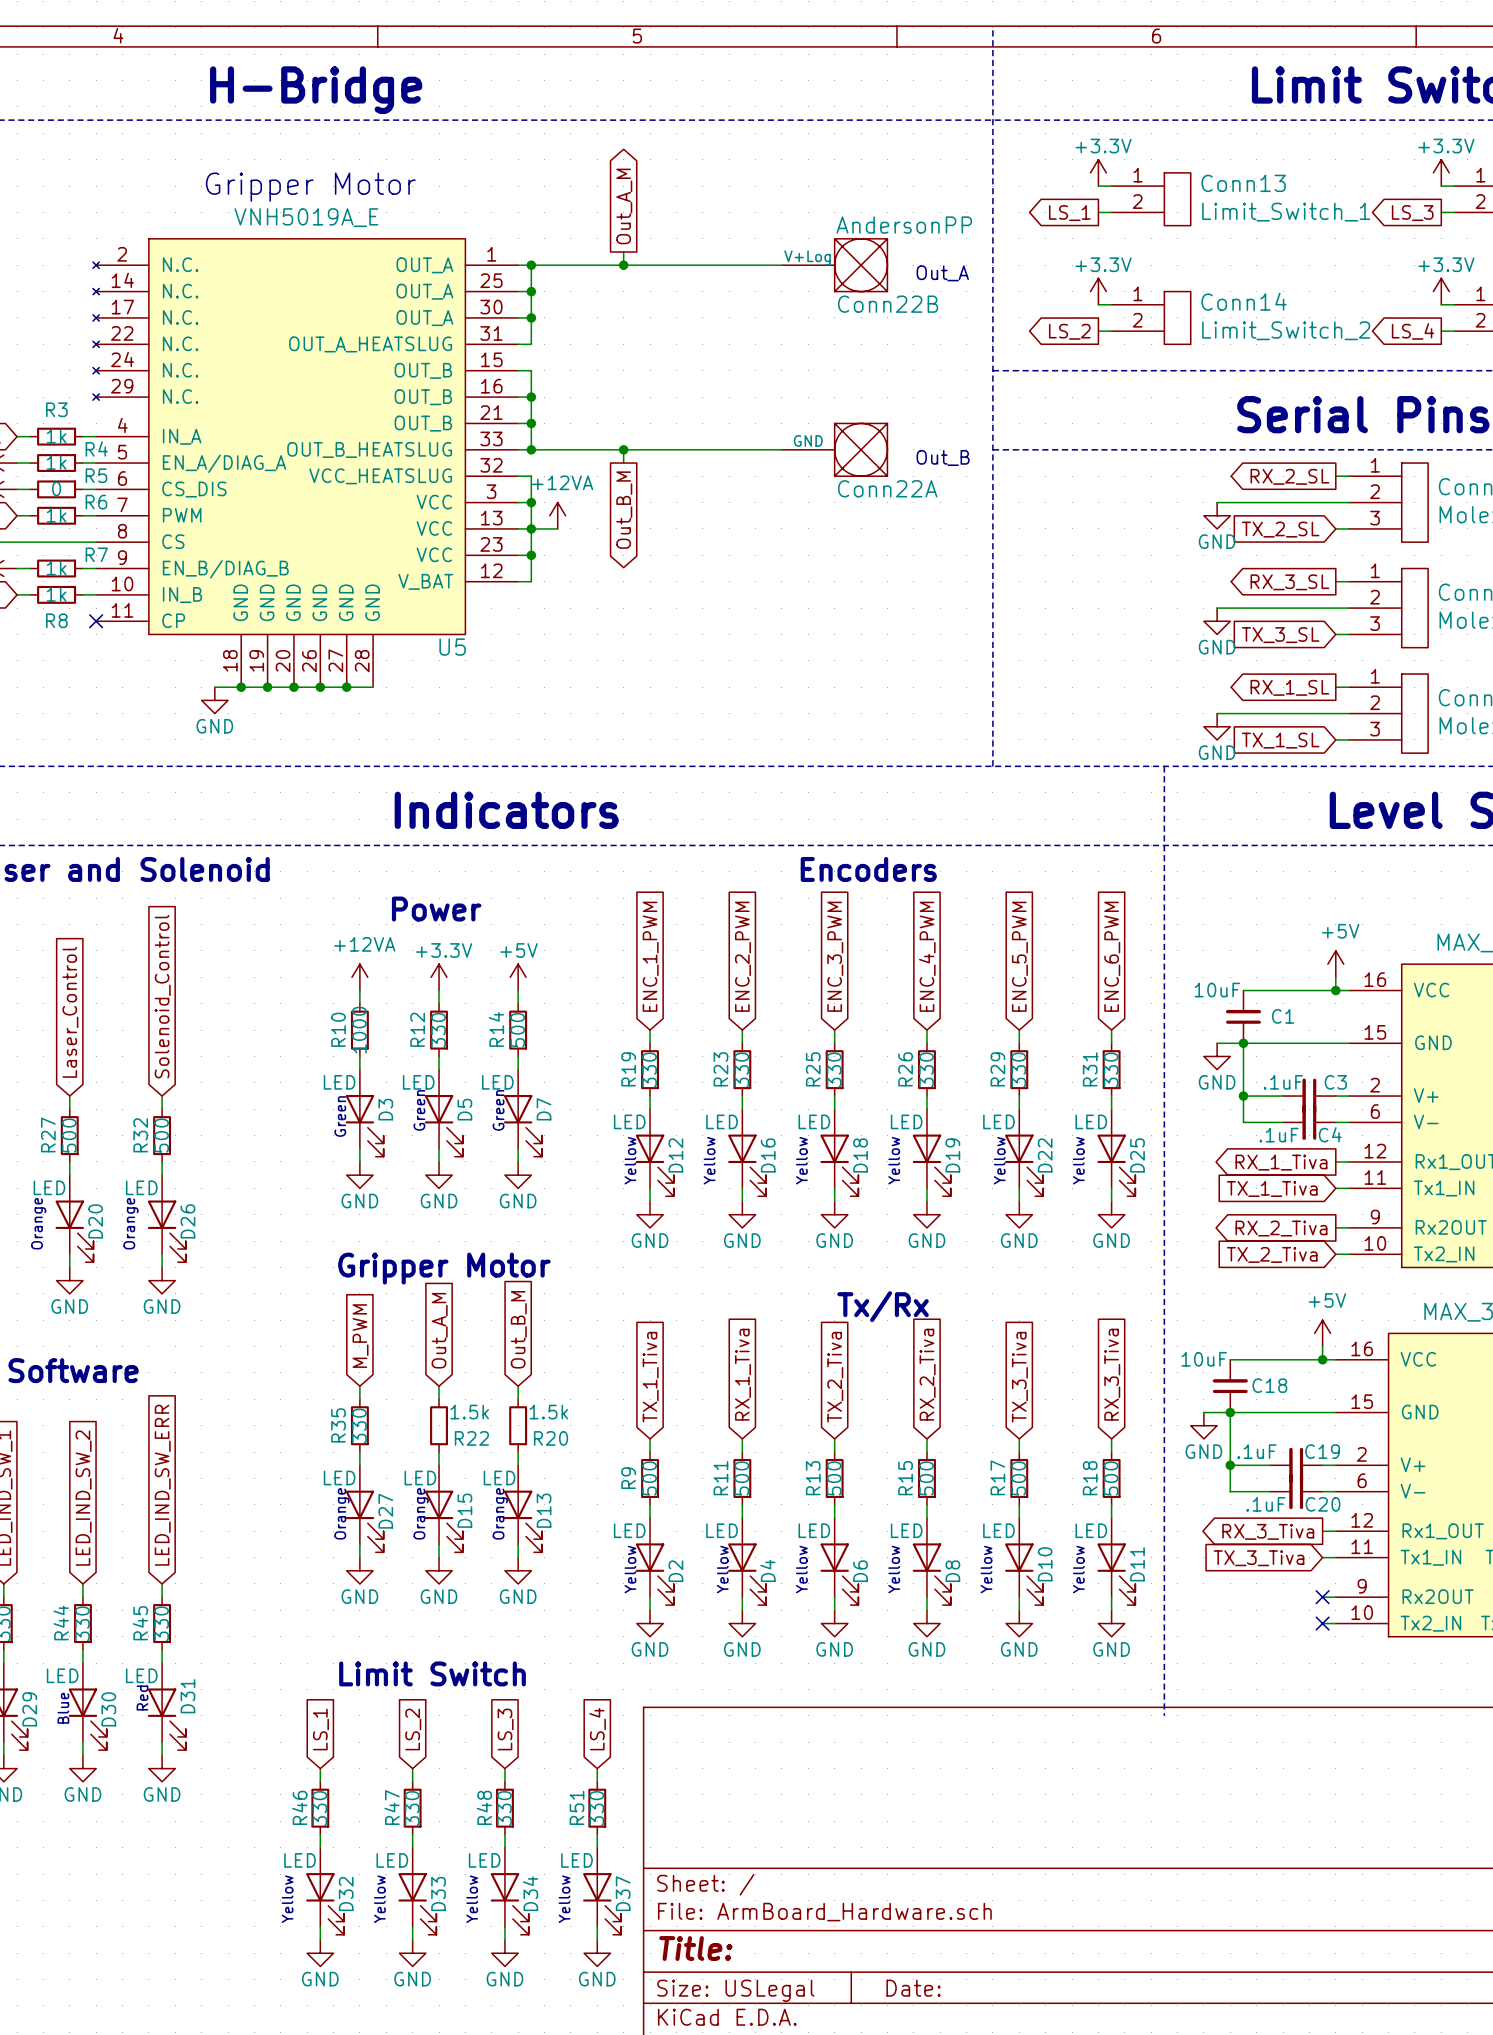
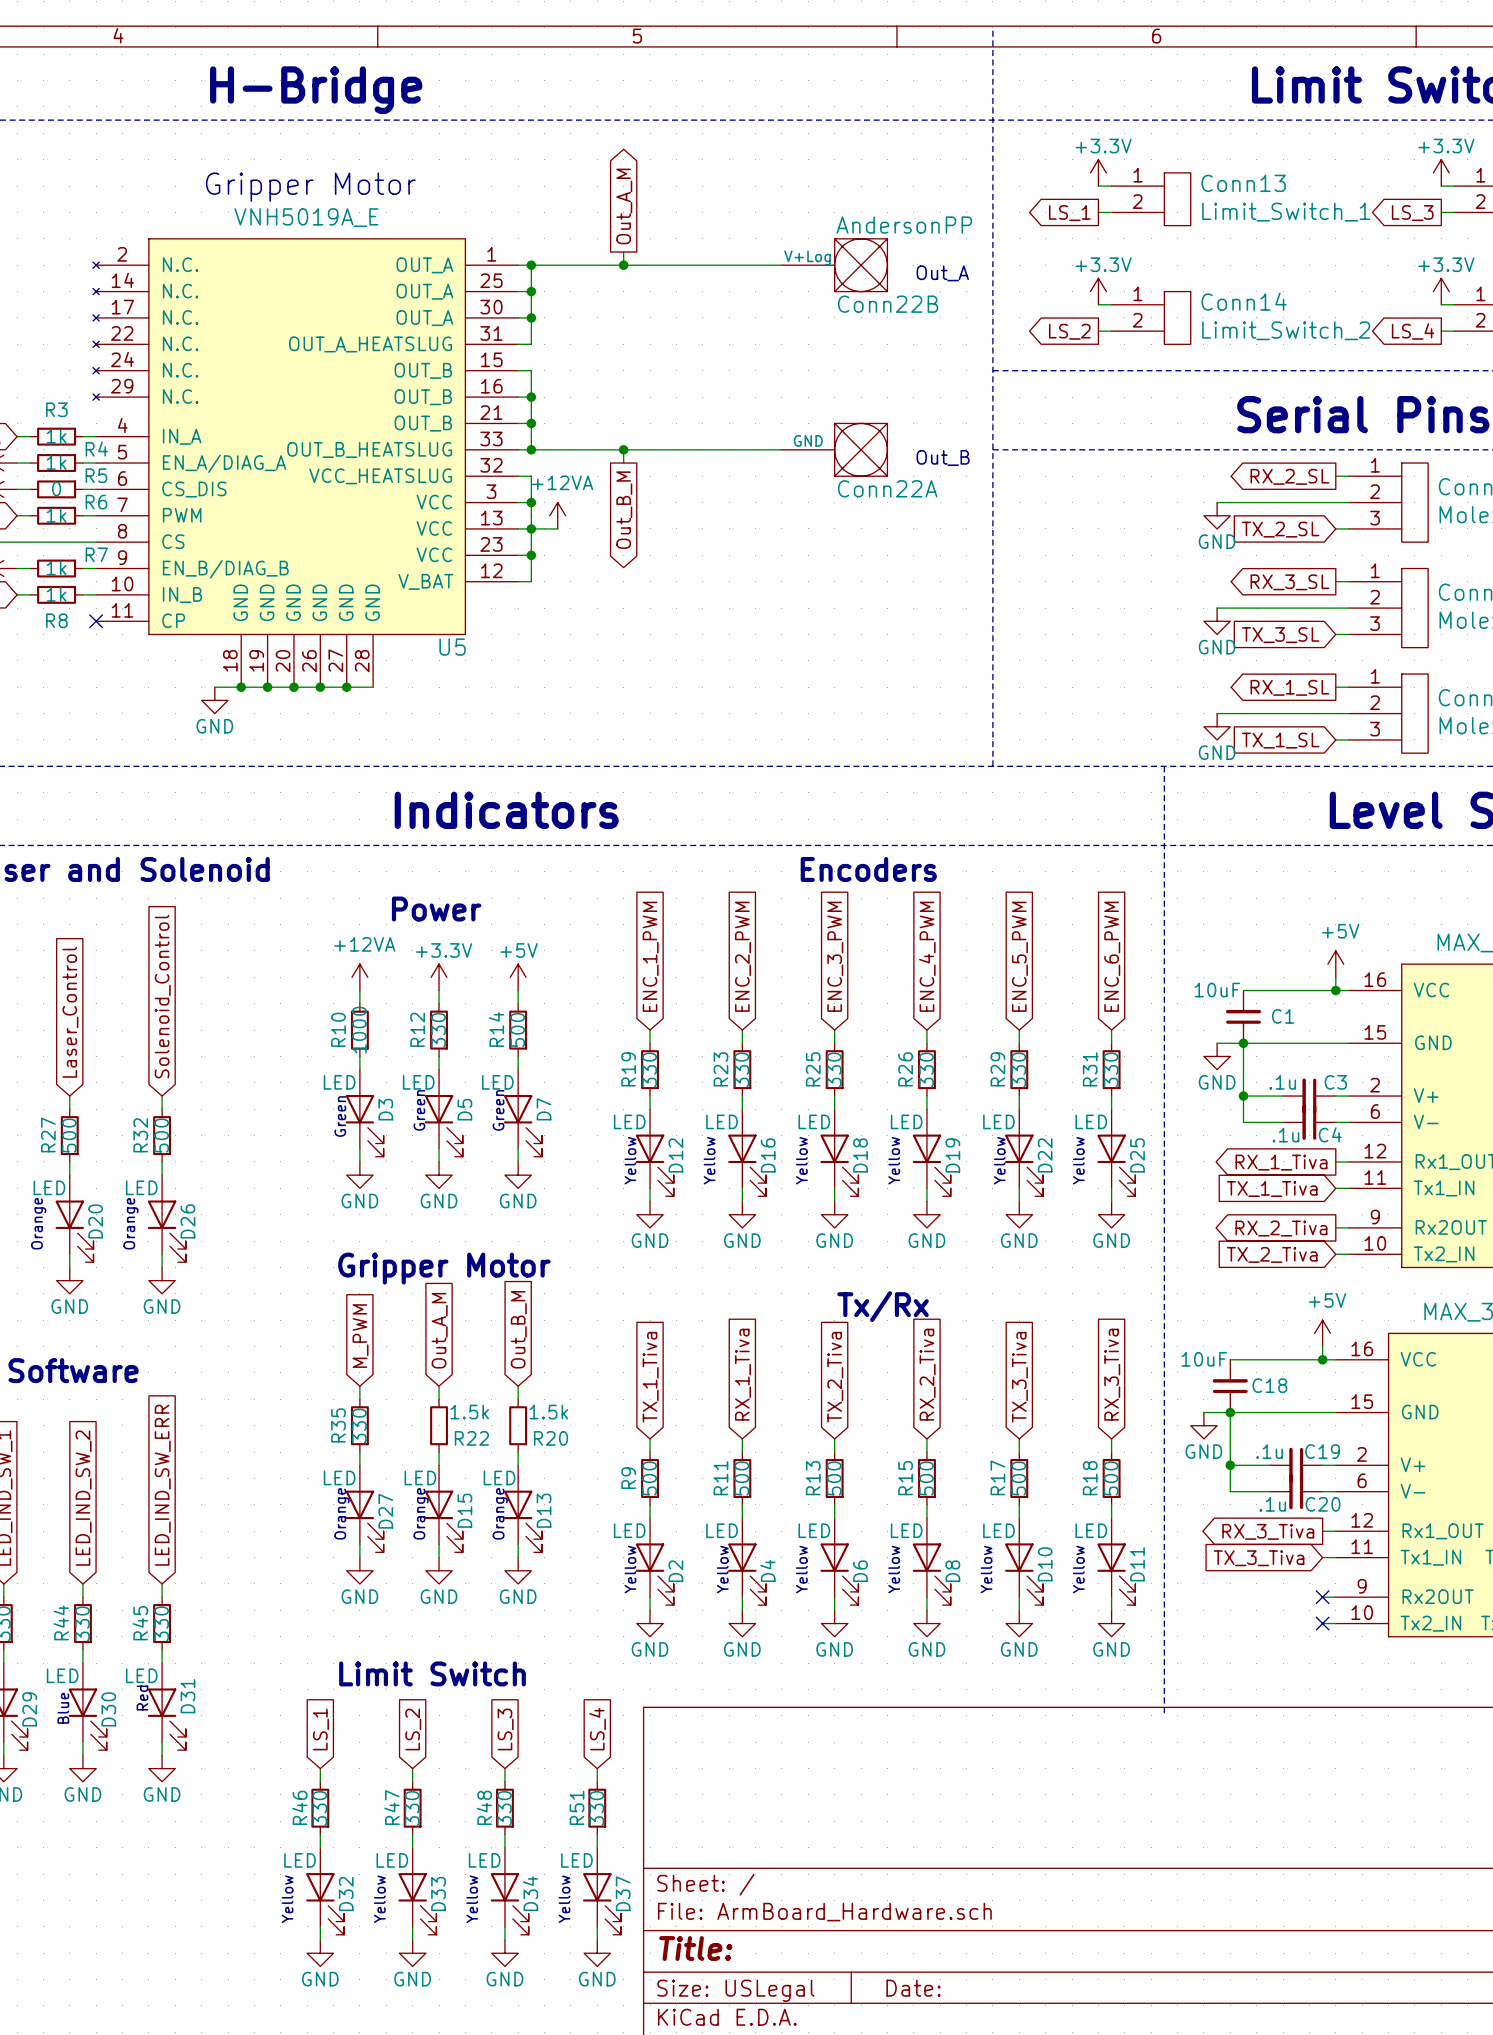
C3 value: .1uF (1283, 1082) -> .1u (1282, 1082)
C4 value: .1uF (1279, 1135) -> .1u (1285, 1135)
C19 value: .1uF (1256, 1451) -> .1u (1269, 1451)
C20 value: .1uF (1265, 1504) -> .1u (1272, 1504)

